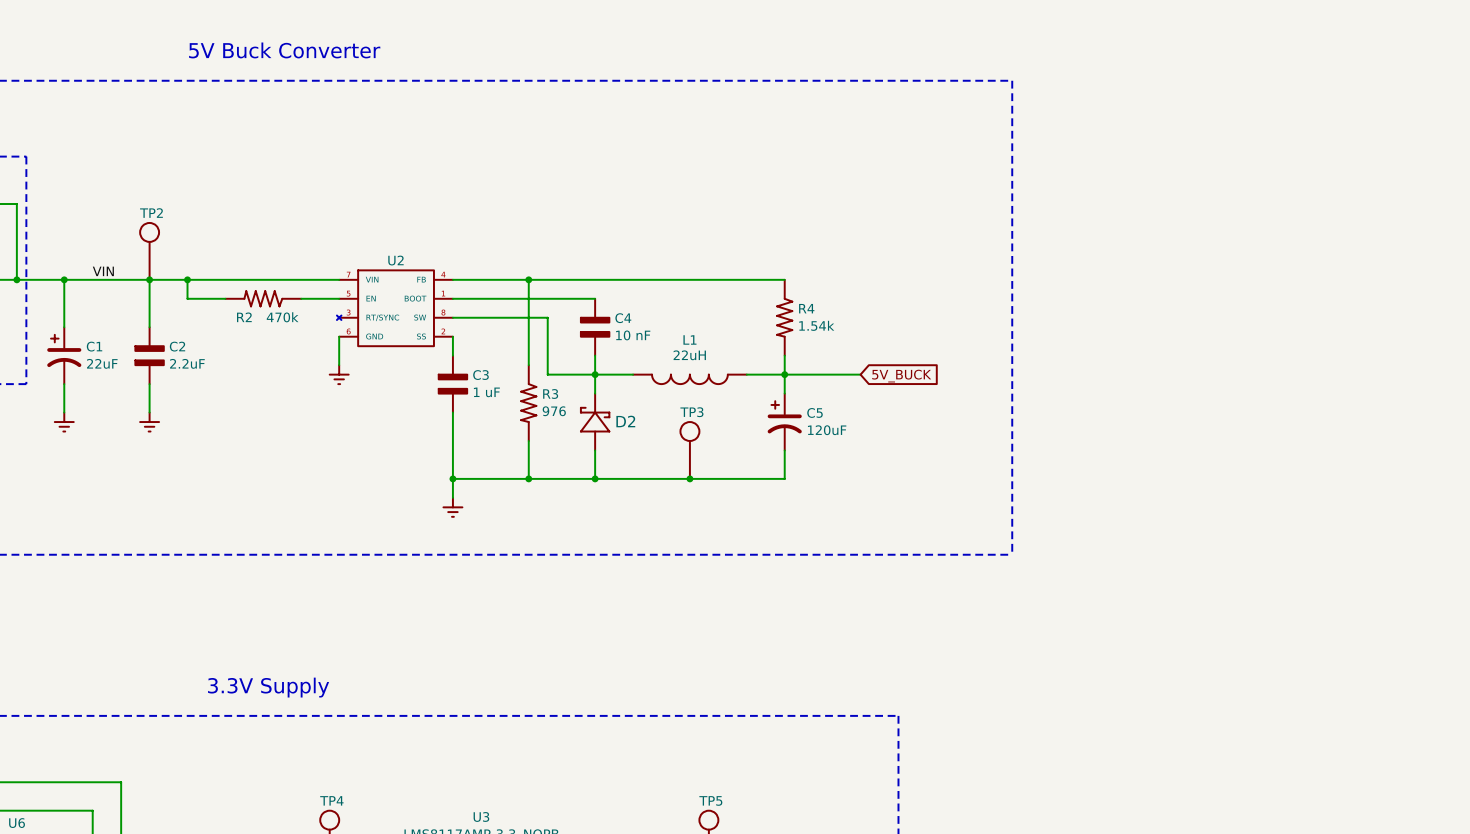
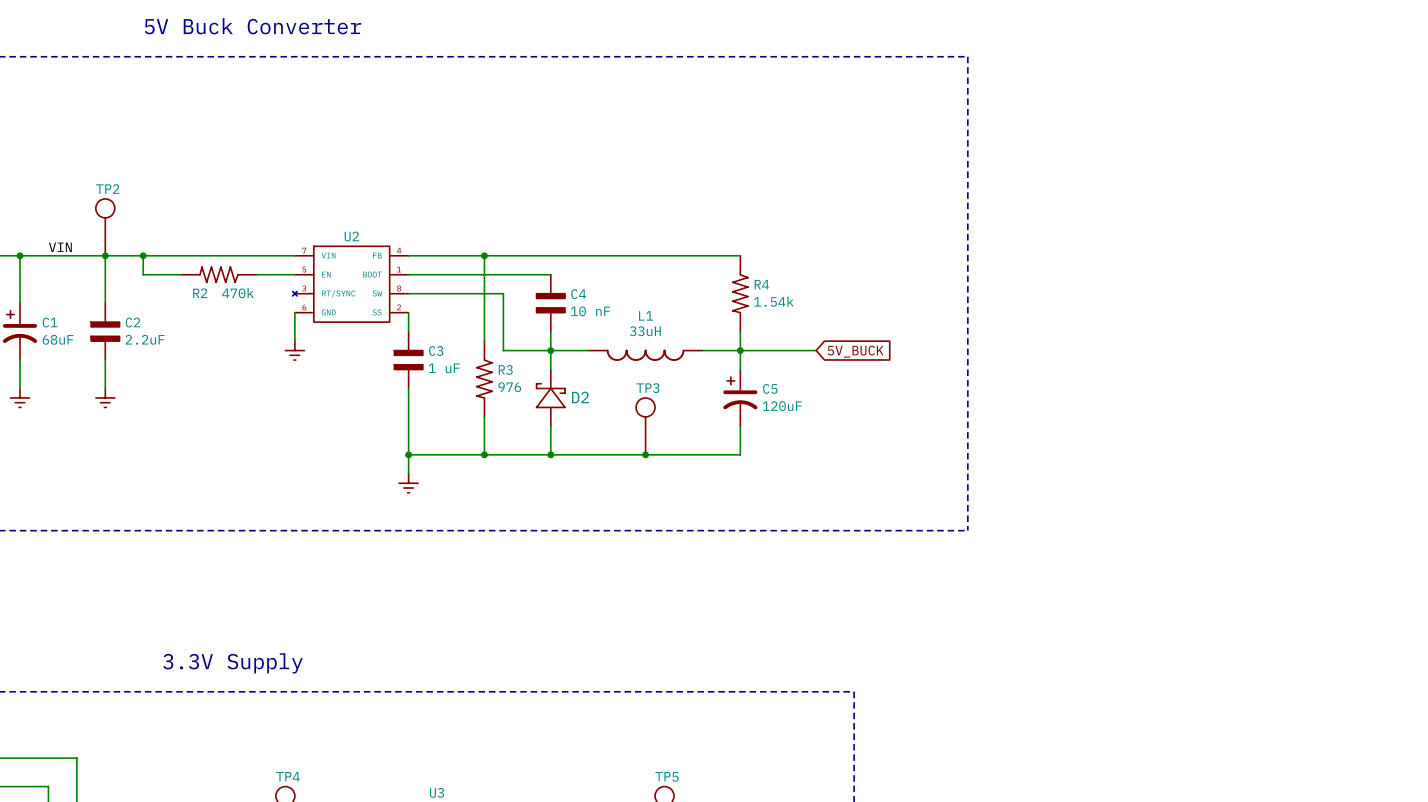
L1 value: 22uH (689, 355) -> 33uH (645, 331)
C1 value: 22uF (102, 363) -> 68uF (58, 339)

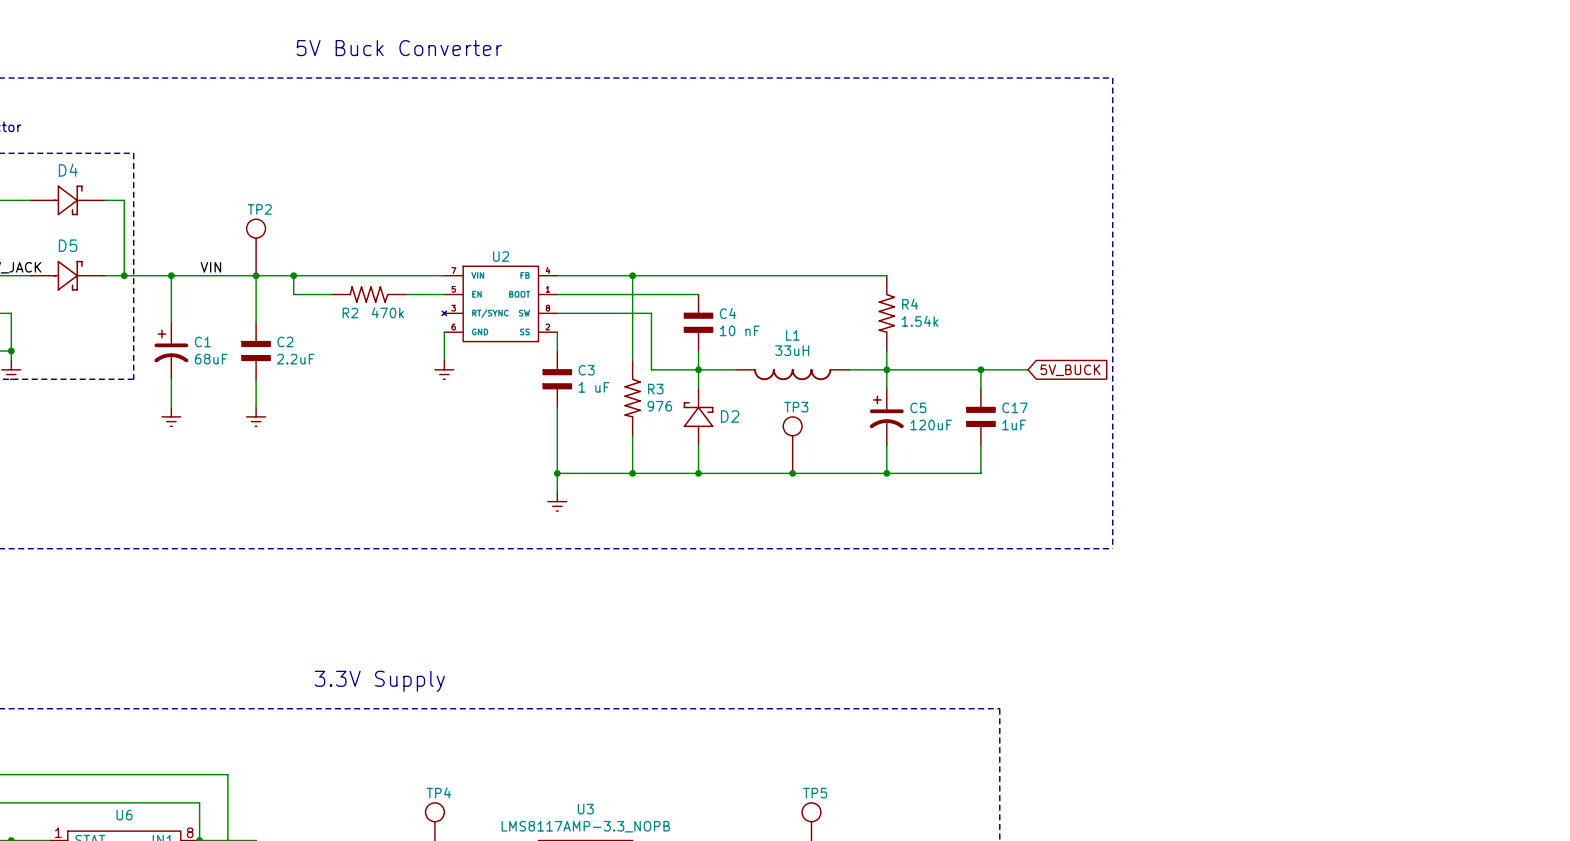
wire: none -> (962, 369) (1028, 369)
wire: none -> (980, 369) (980, 388)
junction: none -> (980, 369)
global label position: 5V_BUCK (855, 351) -> 5V_BUCK (1070, 370)
C17: none -> 1uF (980, 416)
wire: none -> (980, 445) (980, 473) (886, 473)
junction: none -> (886, 473)

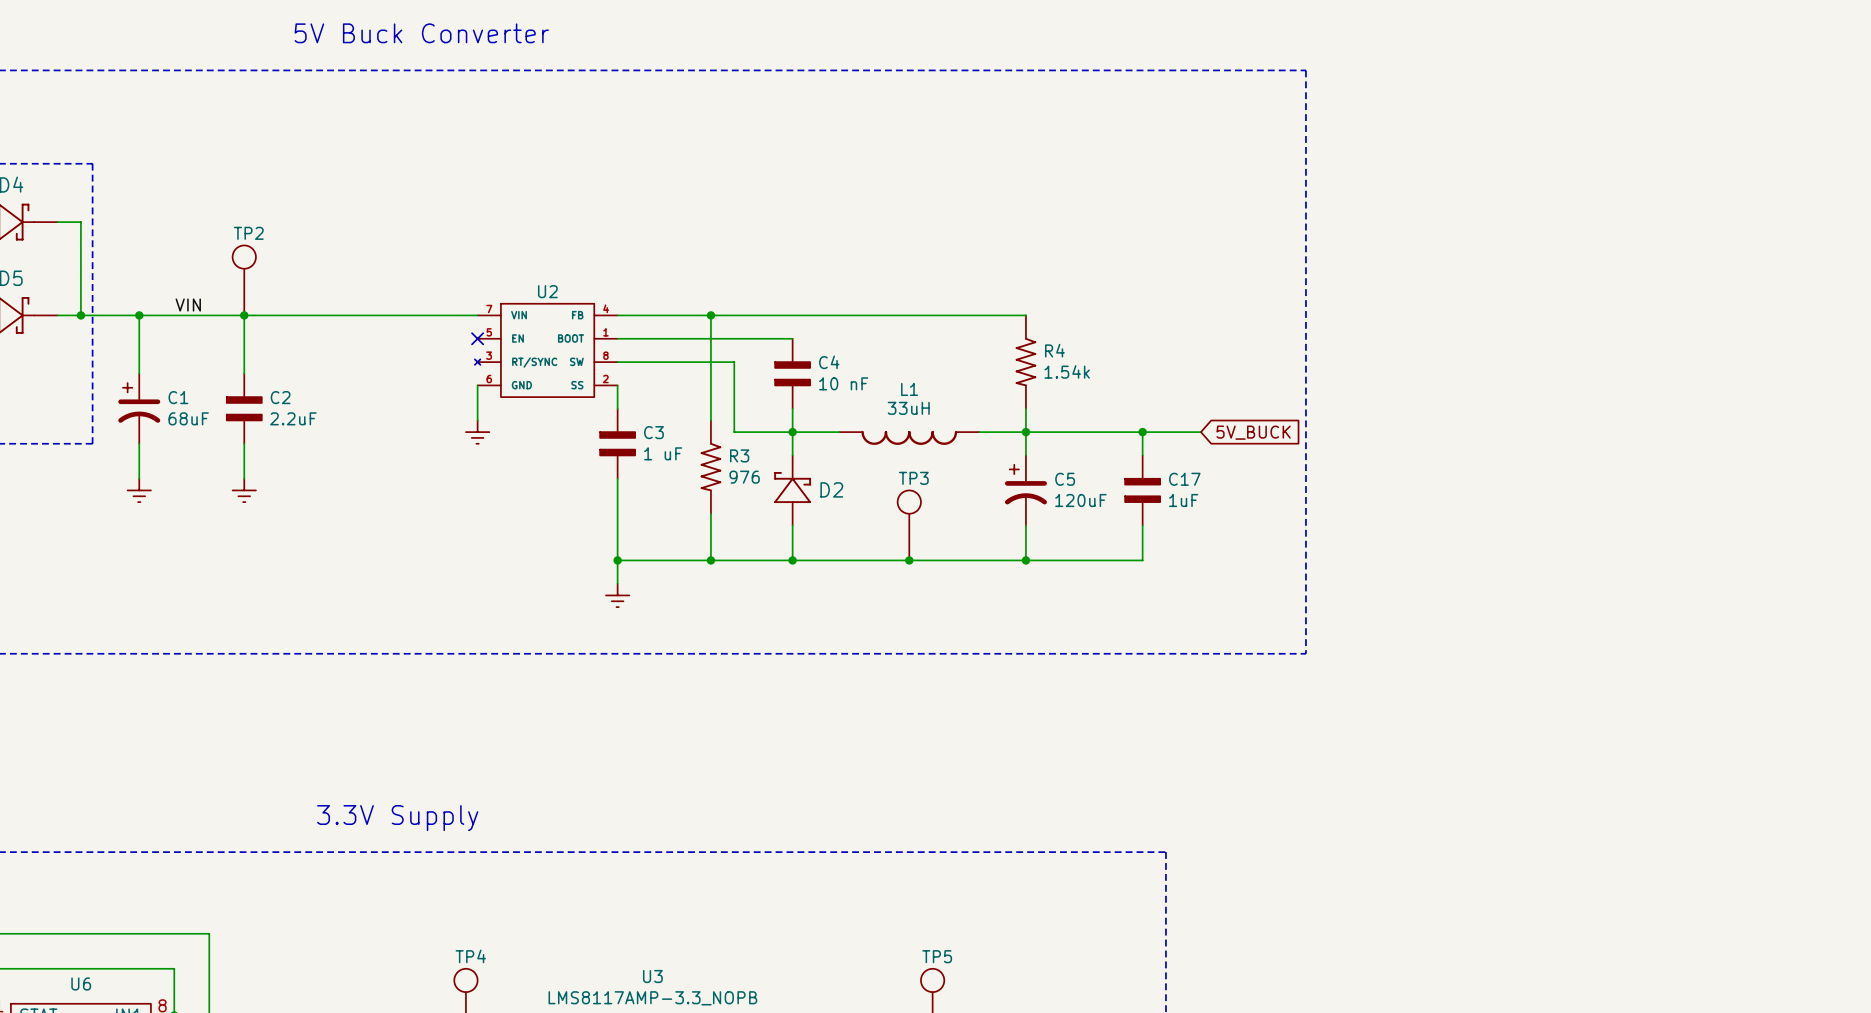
wire: (293, 275) (293, 294) (331, 294) -> none
junction: (293, 275) -> none
R2: 470k (369, 294) -> none
wire: (406, 294) (444, 294) -> none
no-connect mark: none -> (477, 338)

